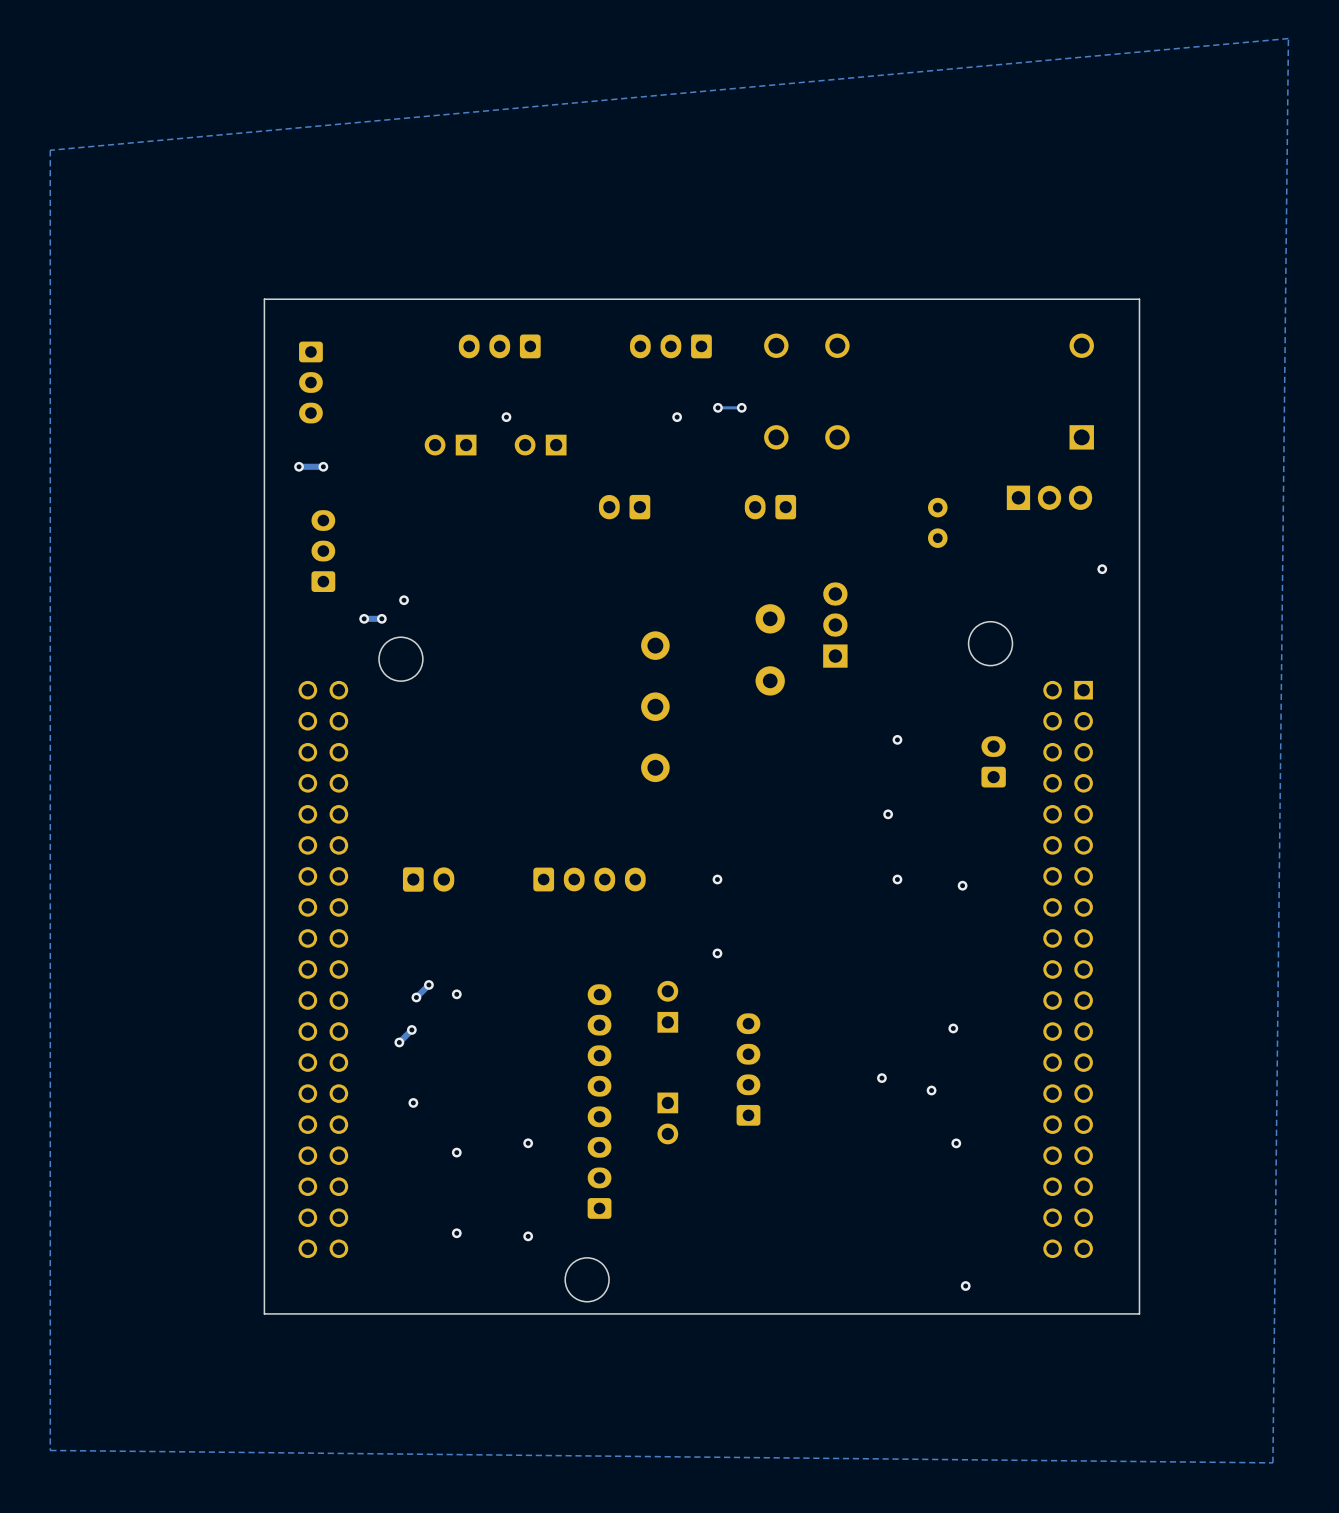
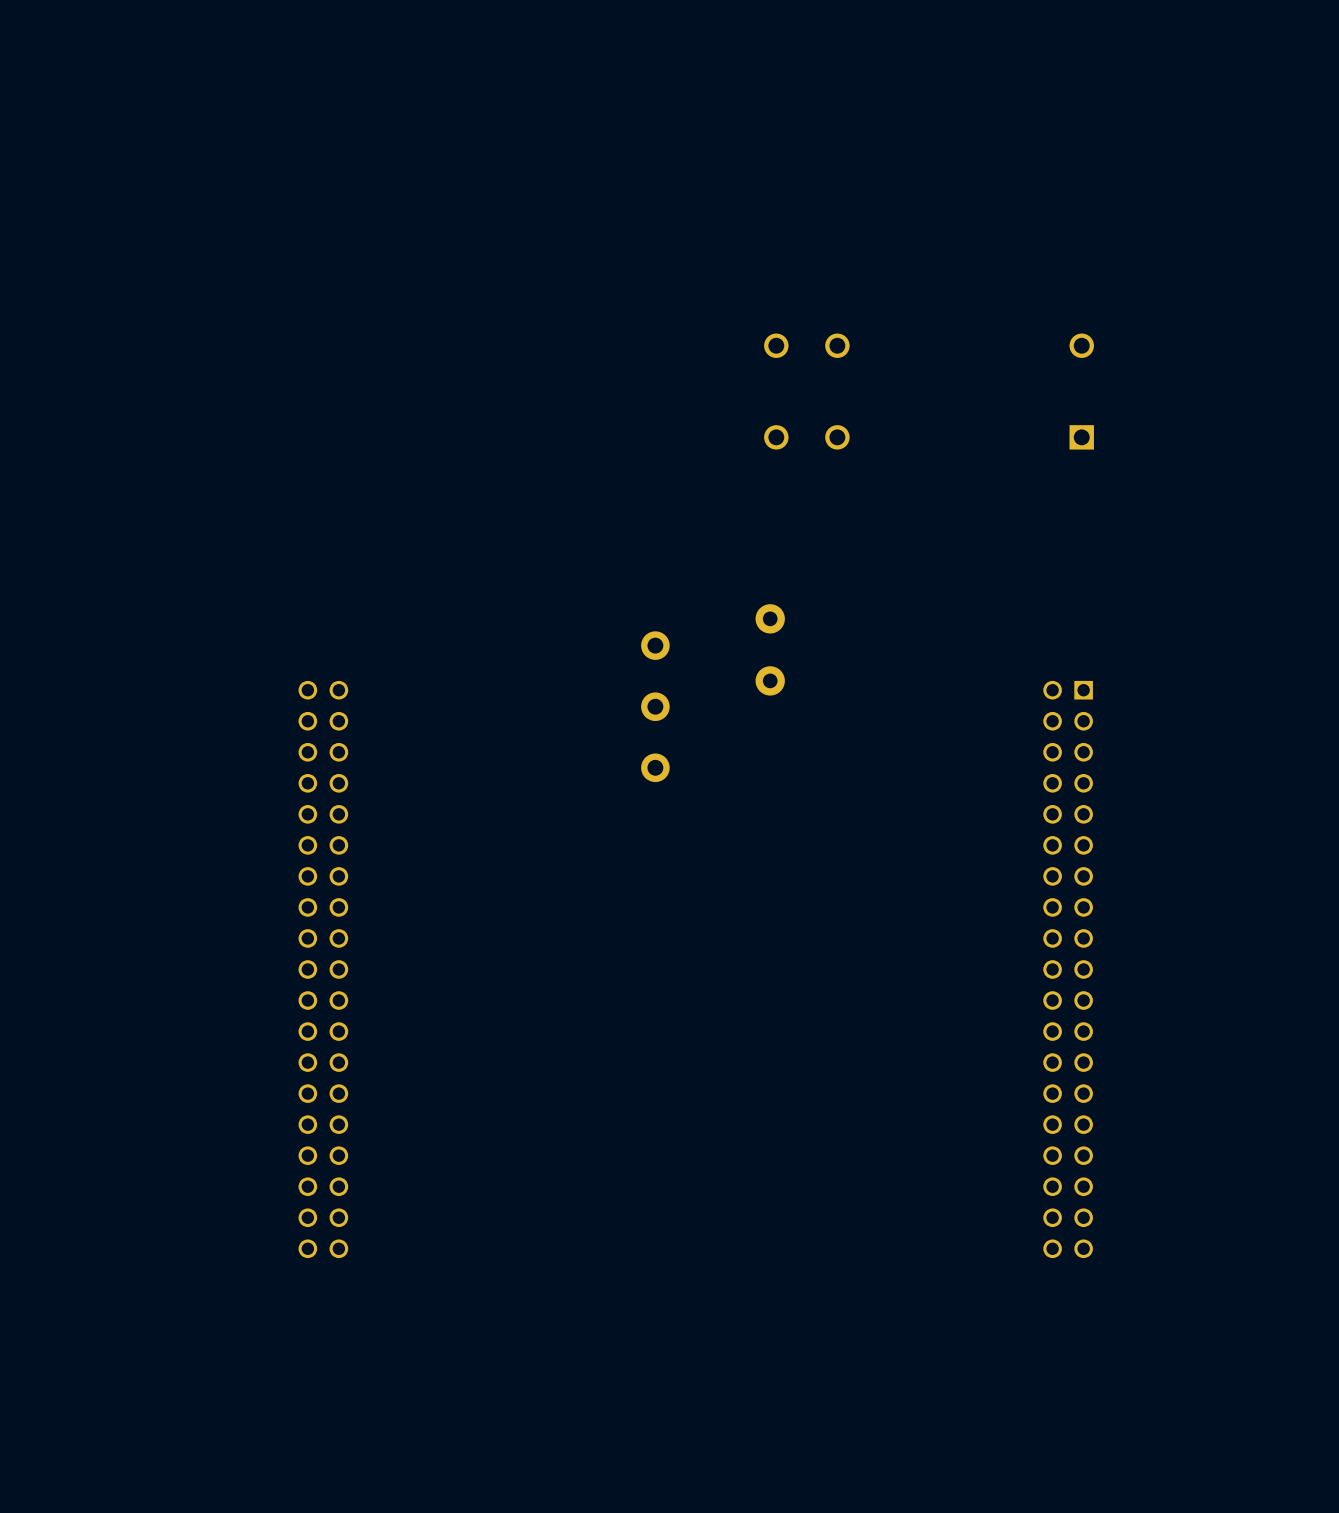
zone outline: (1288, 38) (1272, 1462) (50, 1450) (50, 150) (1288, 38) -> none
board edge: (1139, 299) (264, 299) (264, 1313) (1139, 1313) (1139, 299) -> none
part: (499, 346) -> none
part: (670, 346) -> none
part: (310, 382) -> none
via: (717, 407) -> none
track: (741, 407) (717, 407) -> none
via: (741, 407) -> none
via: (506, 417) -> none
via: (677, 417) -> none
part: (450, 445) -> none
part: (540, 445) -> none
via: (299, 466) -> none
track: (323, 466) (299, 466) -> none
via: (323, 466) -> none
part: (1049, 497) -> none
part: (624, 507) -> none
part: (770, 507) -> none
part: (937, 522) -> none
part: (323, 551) -> none
via: (1102, 569) -> none
via: (404, 600) -> none
via: (364, 618) -> none
track: (381, 618) (364, 618) -> none
via: (381, 618) -> none
round board edge: [967, 621, 1014, 667] -> none
part: (835, 625) -> none
round board edge: [378, 636, 424, 682] -> none
via: (897, 739) -> none
part: (993, 761) -> none
via: (888, 814) -> none
part: (428, 879) -> none
part: (589, 879) -> none
via: (717, 879) -> none
via: (897, 879) -> none
via: (962, 885) -> none
via: (717, 953) -> none
track: (428, 984) (416, 997) -> none
via: (428, 984) -> none
via: (456, 994) -> none
via: (416, 997) -> none
part: (667, 1006) -> none
via: (953, 1028) -> none
track: (411, 1029) (399, 1042) -> none
via: (411, 1029) -> none
via: (399, 1042) -> none
part: (748, 1069) -> none
via: (881, 1078) -> none
via: (931, 1090) -> none
part: (599, 1101) -> none
via: (413, 1102) -> none
part: (667, 1118) -> none
via: (528, 1143) -> none
via: (956, 1143) -> none
via: (456, 1152) -> none
via: (456, 1233) -> none
via: (528, 1236) -> none
round board edge: [564, 1257, 610, 1303] -> none
via: (965, 1286) -> none

